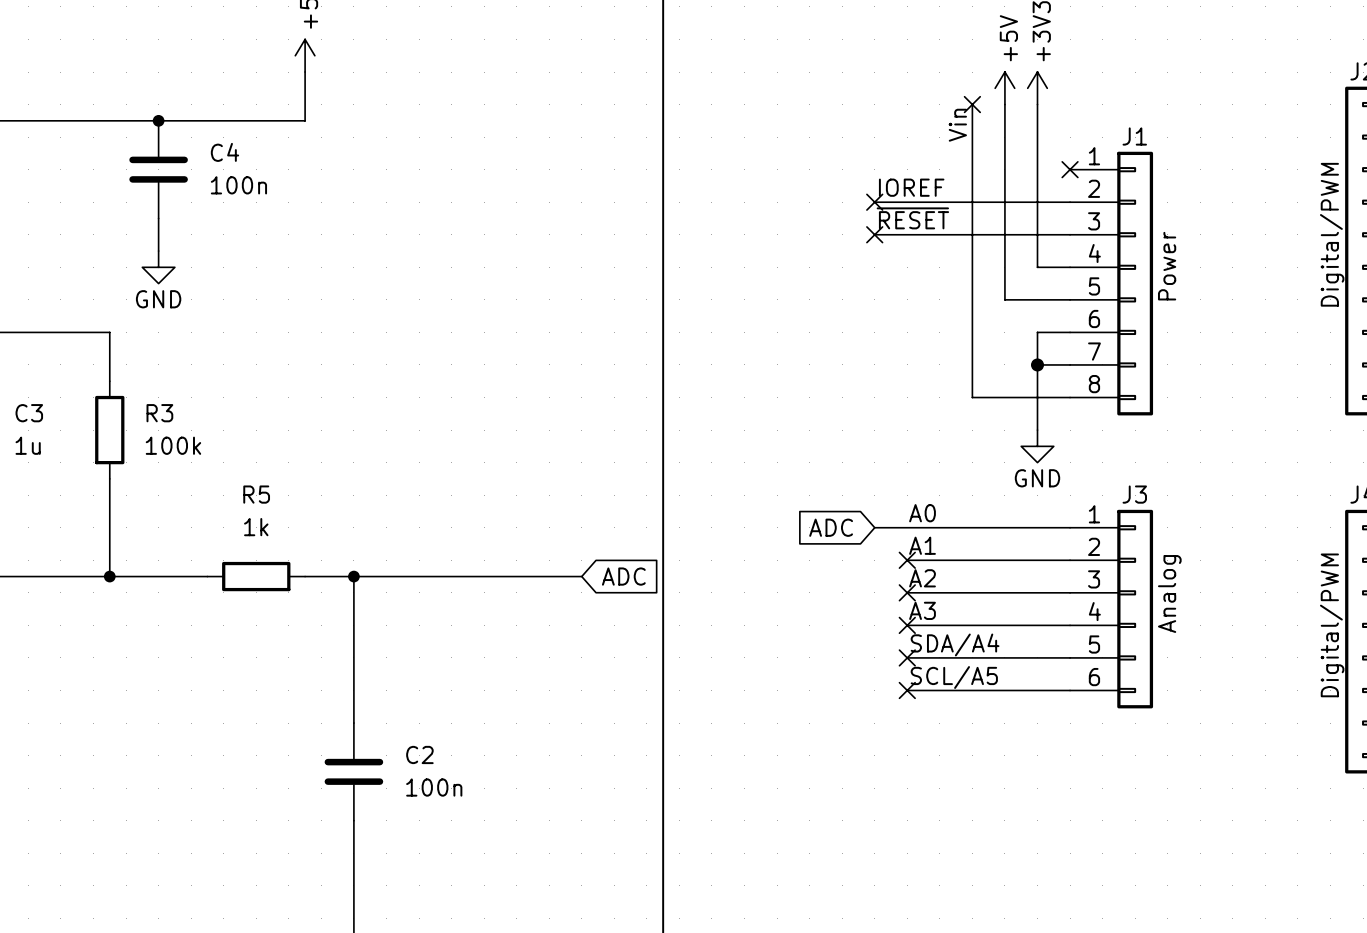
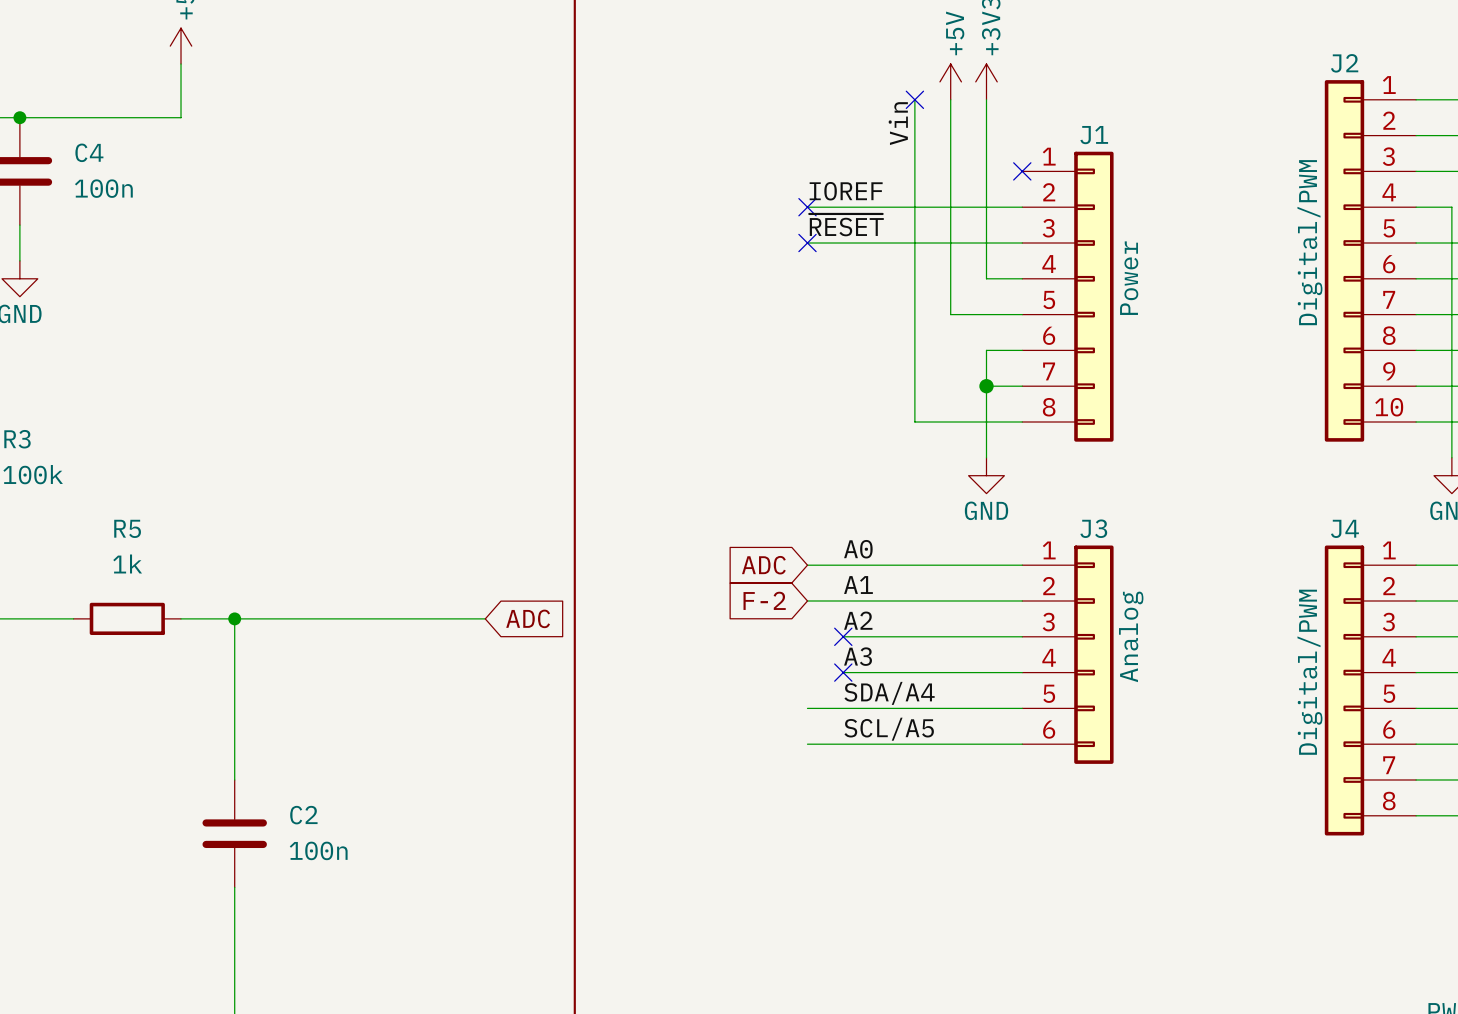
global label: none -> F-2 (764, 600)
wire: none -> (807, 600) (843, 600)
no-connect mark: (907, 560) -> none
wire: none -> (807, 708) (843, 708)
no-connect mark: (907, 657) -> none
wire: none -> (807, 744) (843, 744)
no-connect mark: (907, 690) -> none

